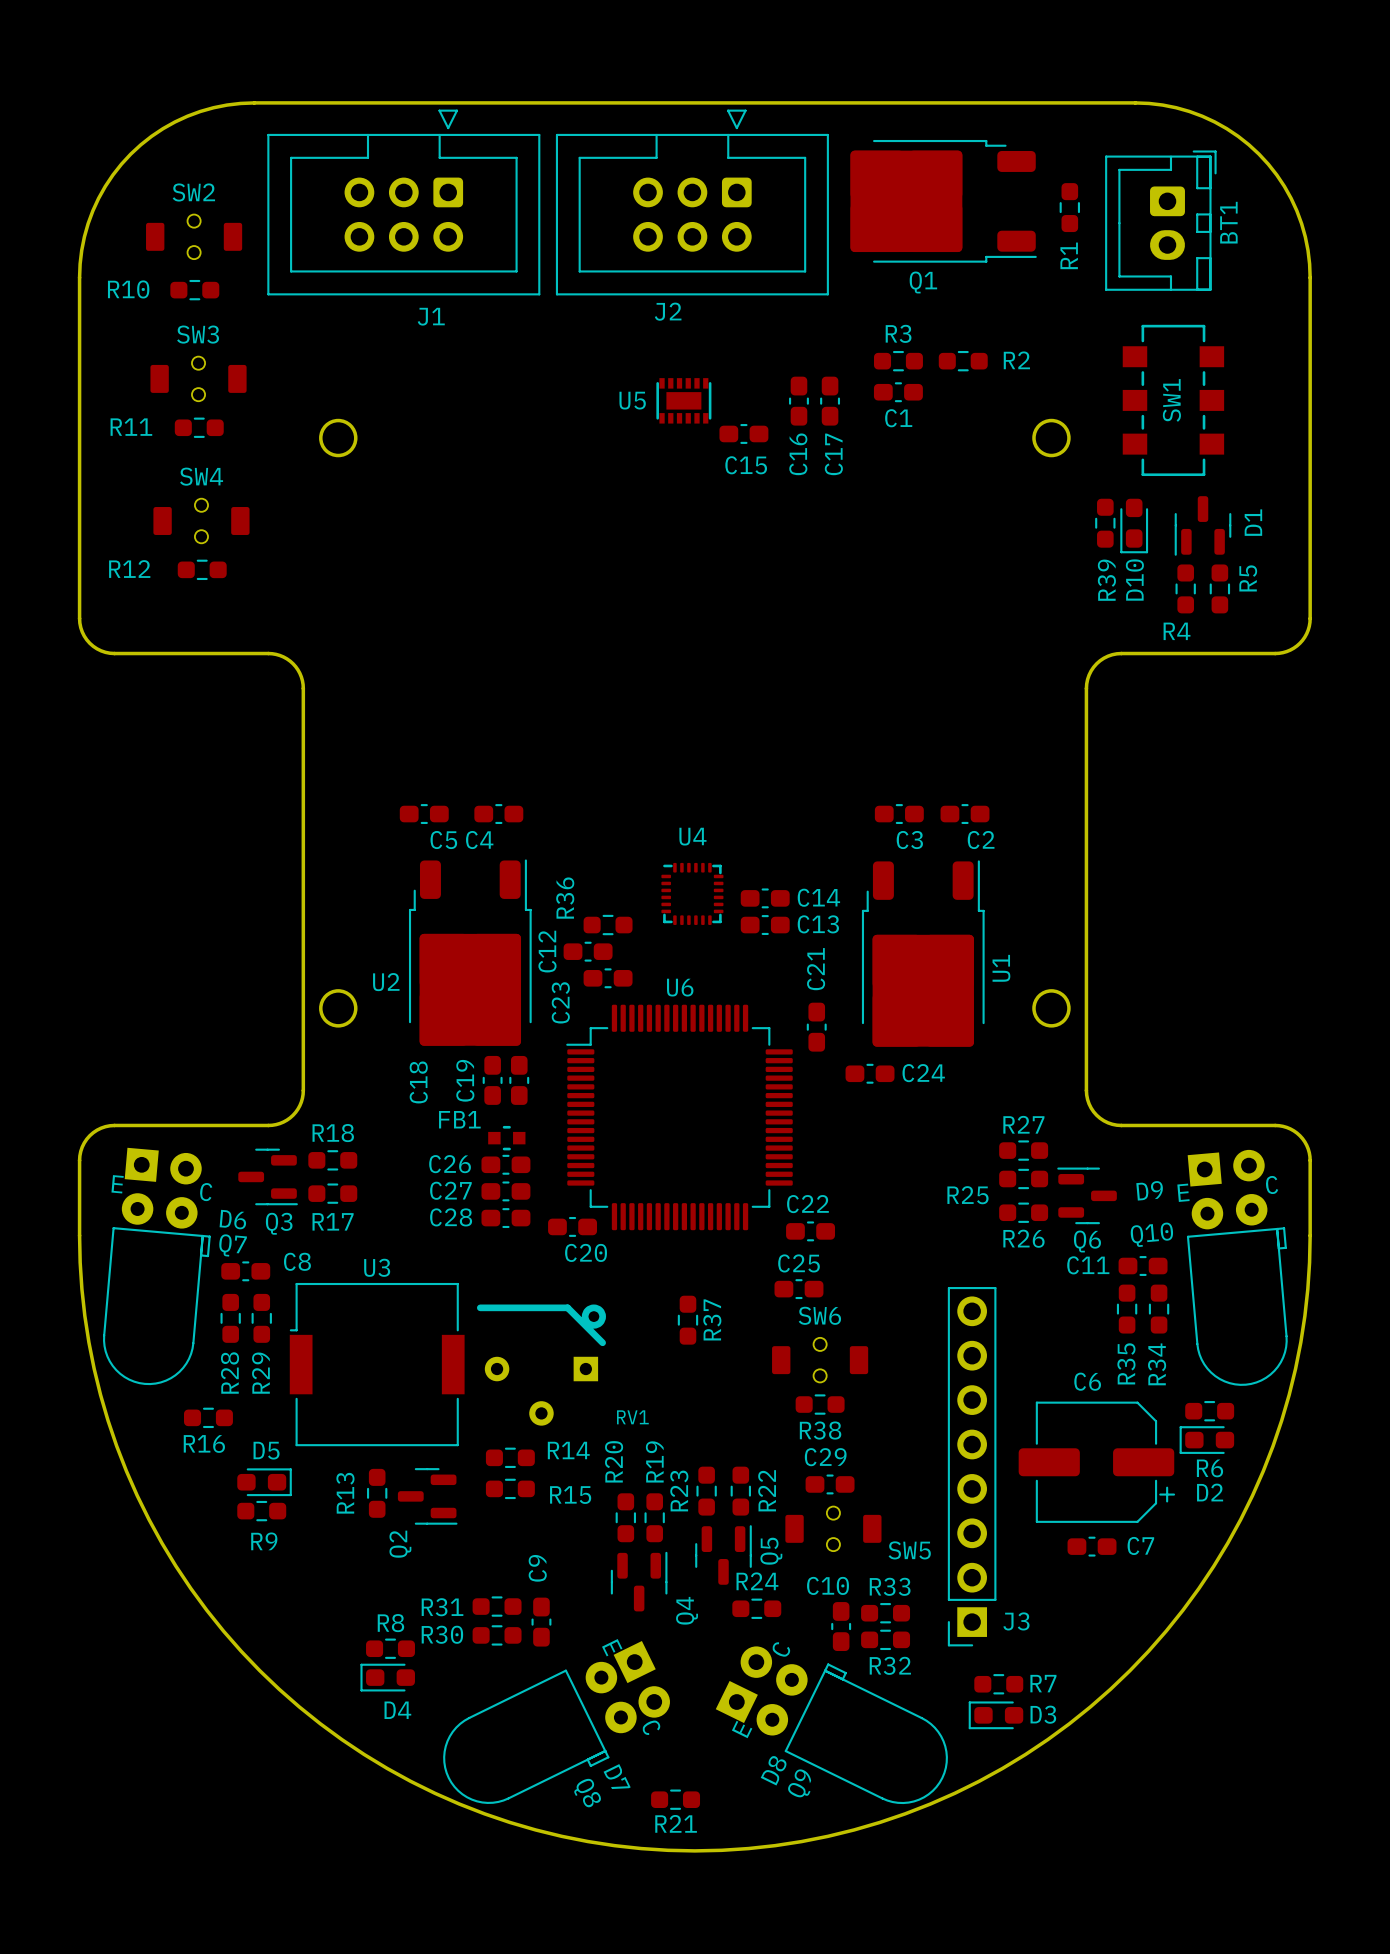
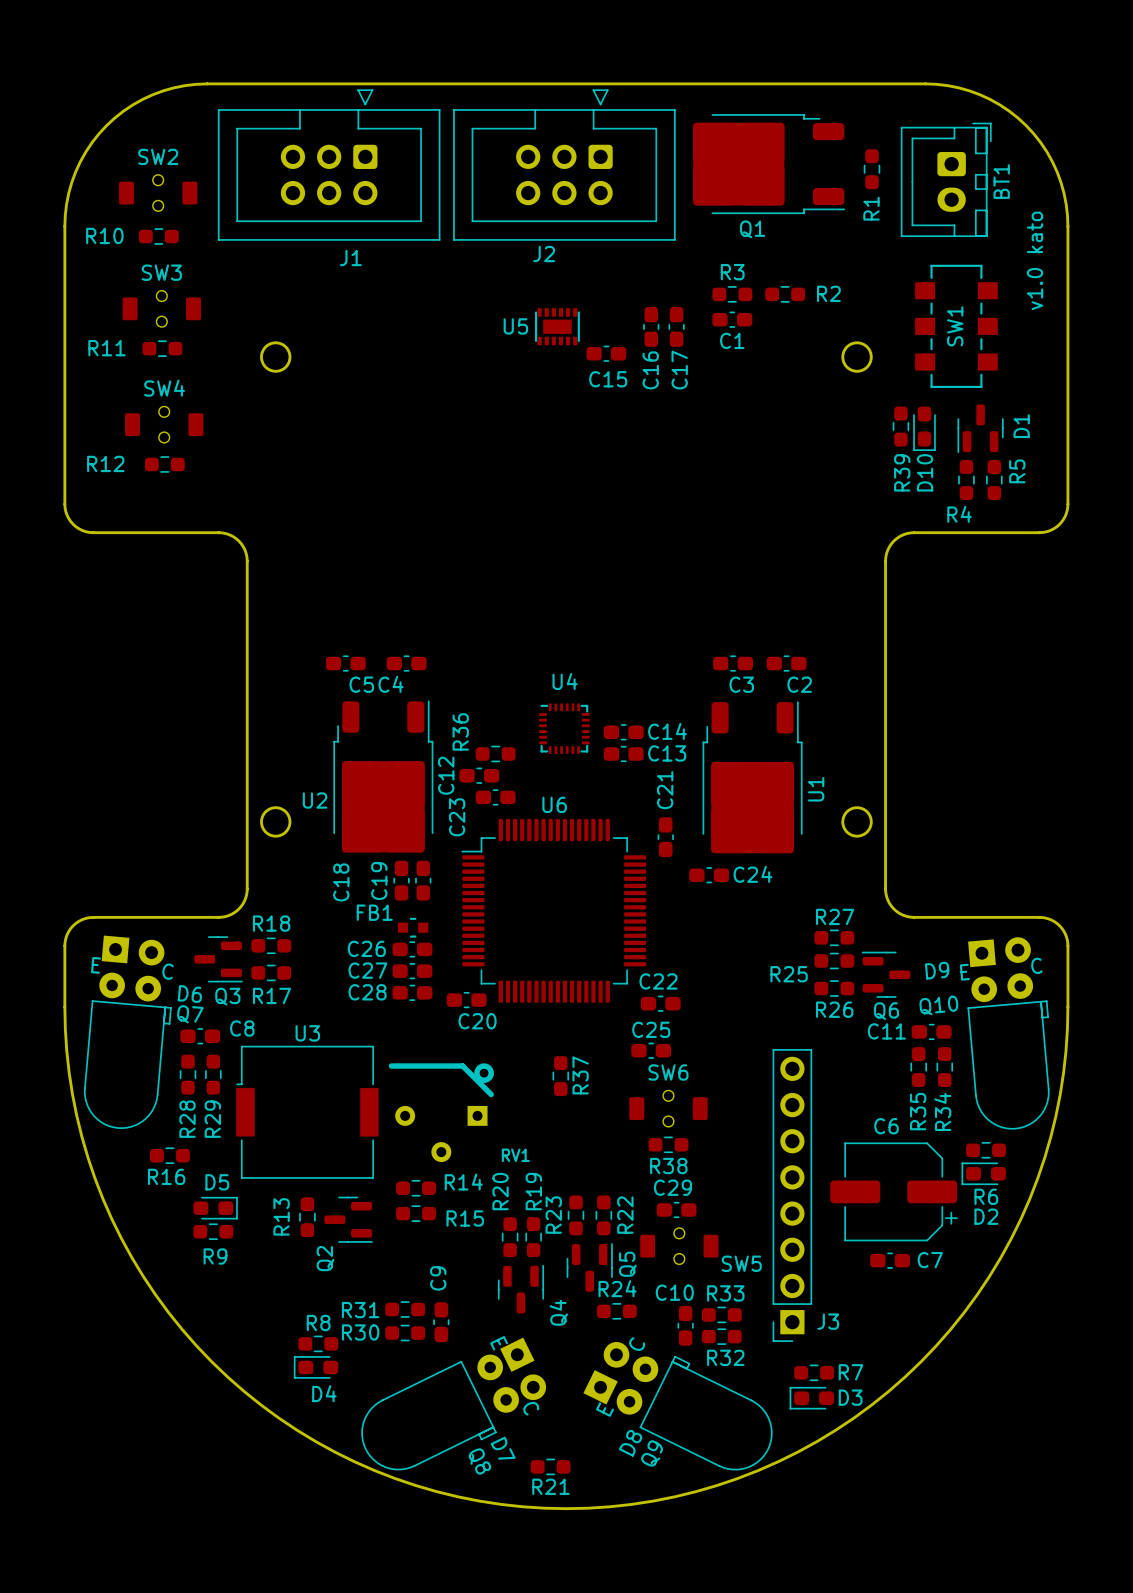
text: none -> v1.0 kato (1035, 260)

